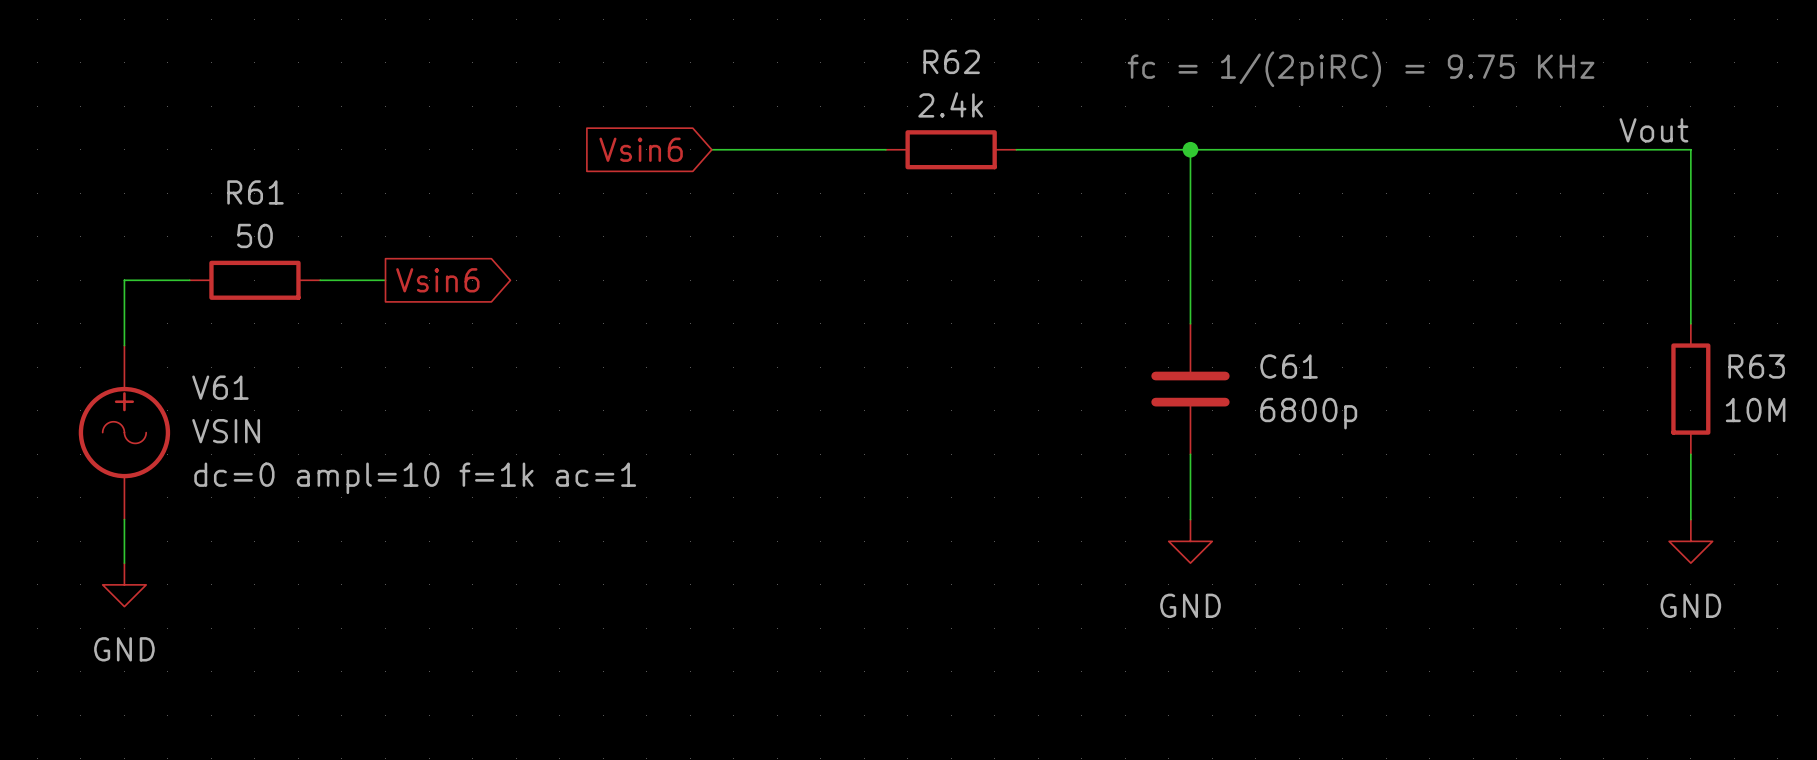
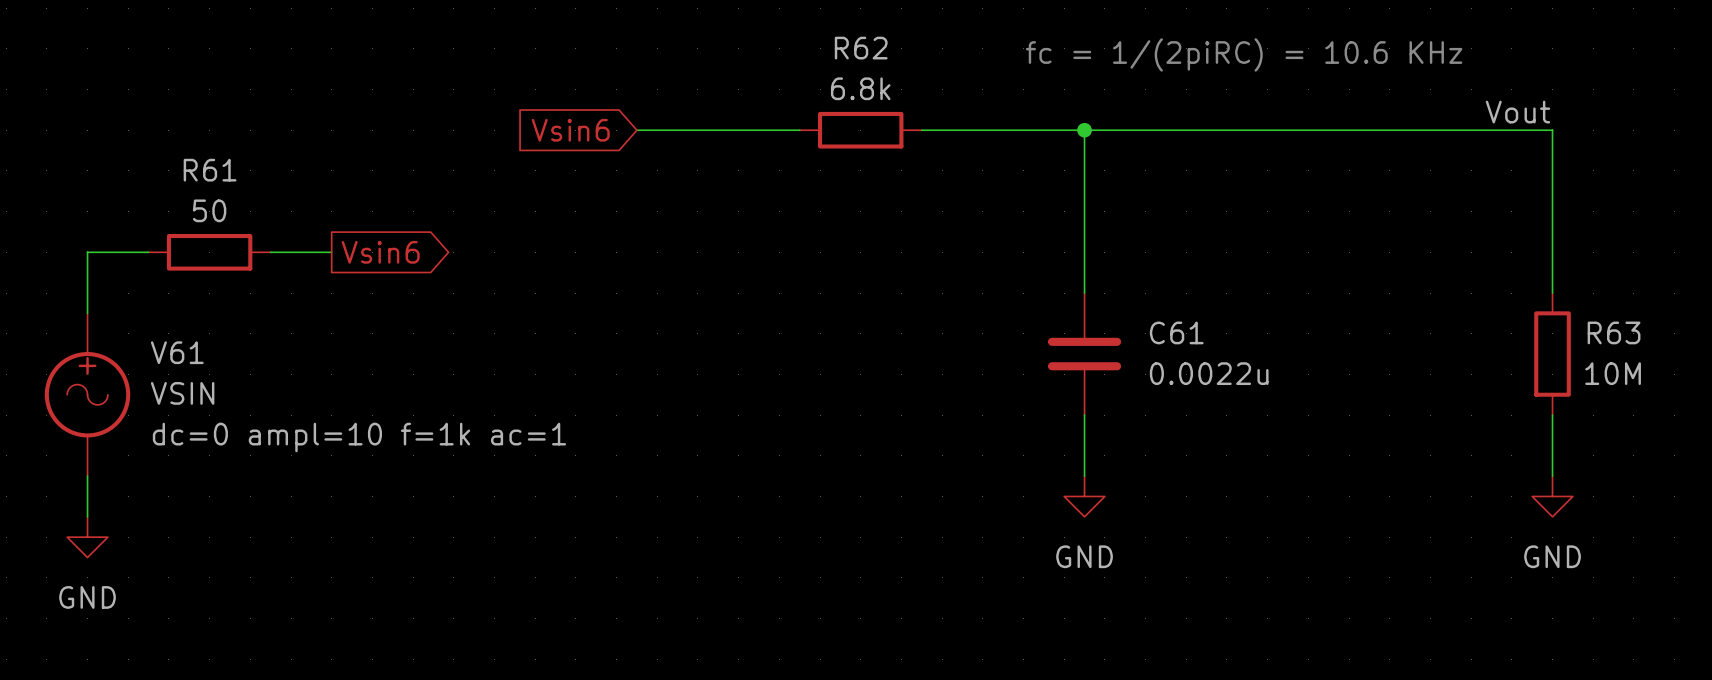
text: fc = 1/(2piRC) = 9.75 KHz (1361, 69) -> fc = 1/(2piRC) = 10.6 KHz (1244, 54)
R62 value: 2.4k (950, 104) -> 6.8k (860, 88)
C61 value: 6800p (1308, 413) -> 0.0022u (1209, 373)

